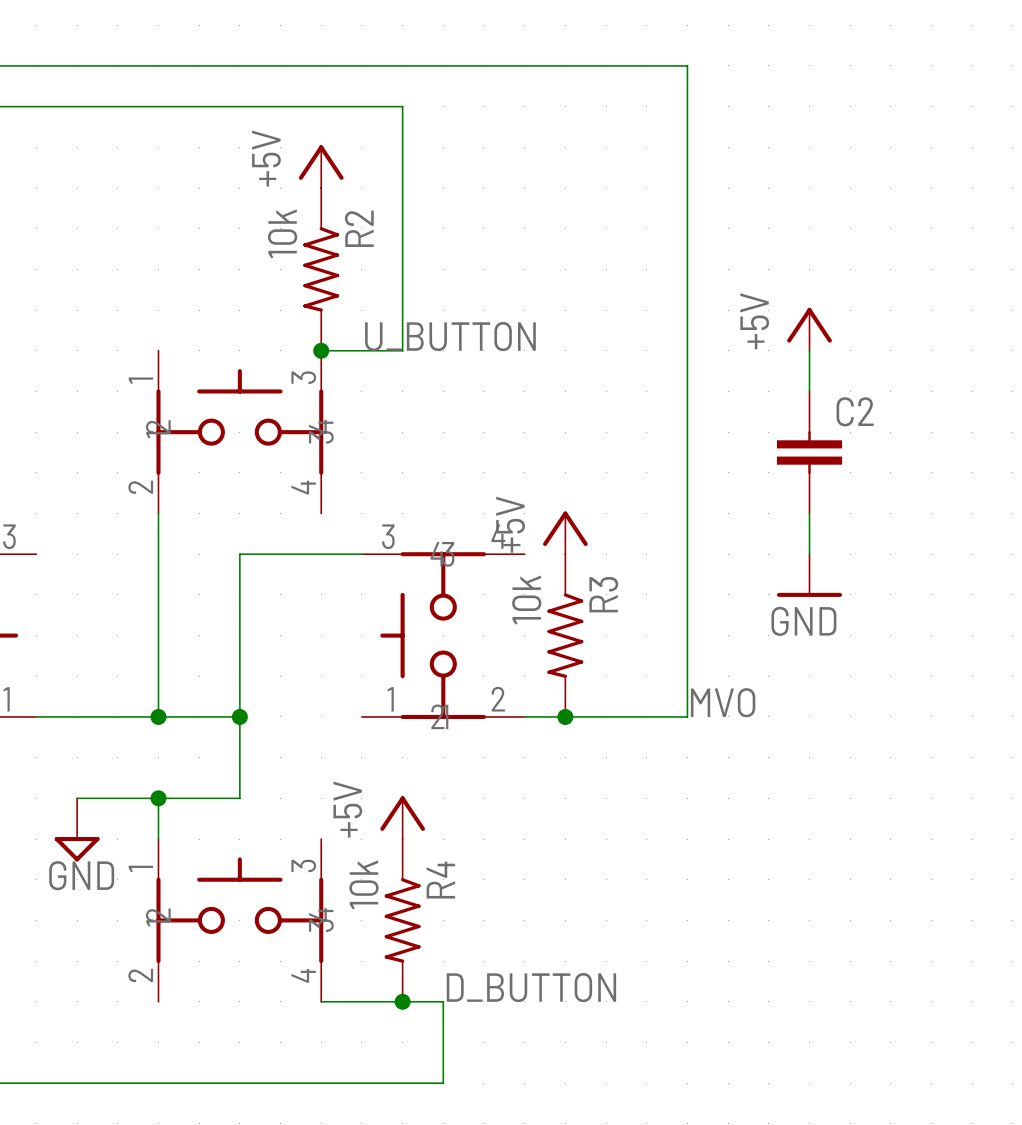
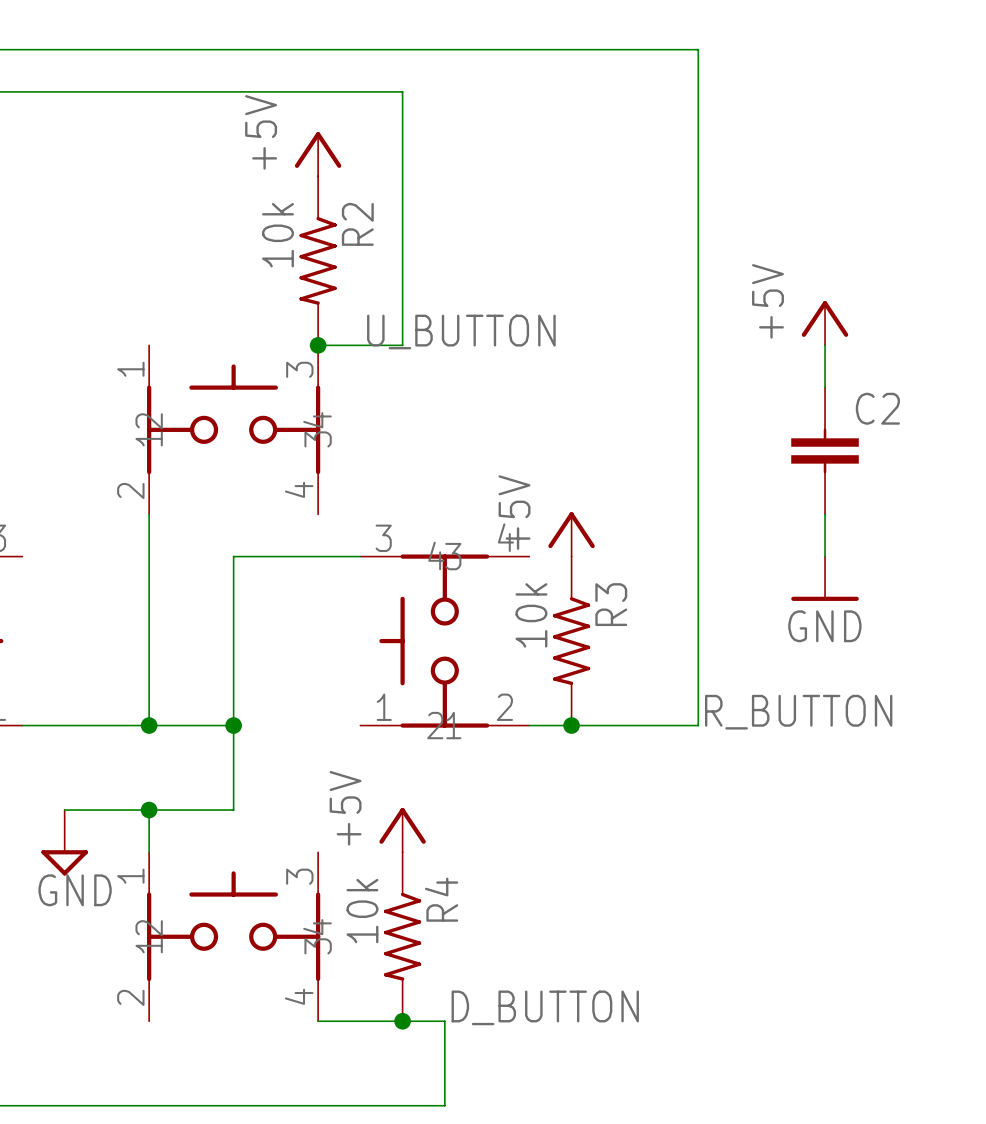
label: MVO (723, 702) -> R_BUTTON (798, 712)

